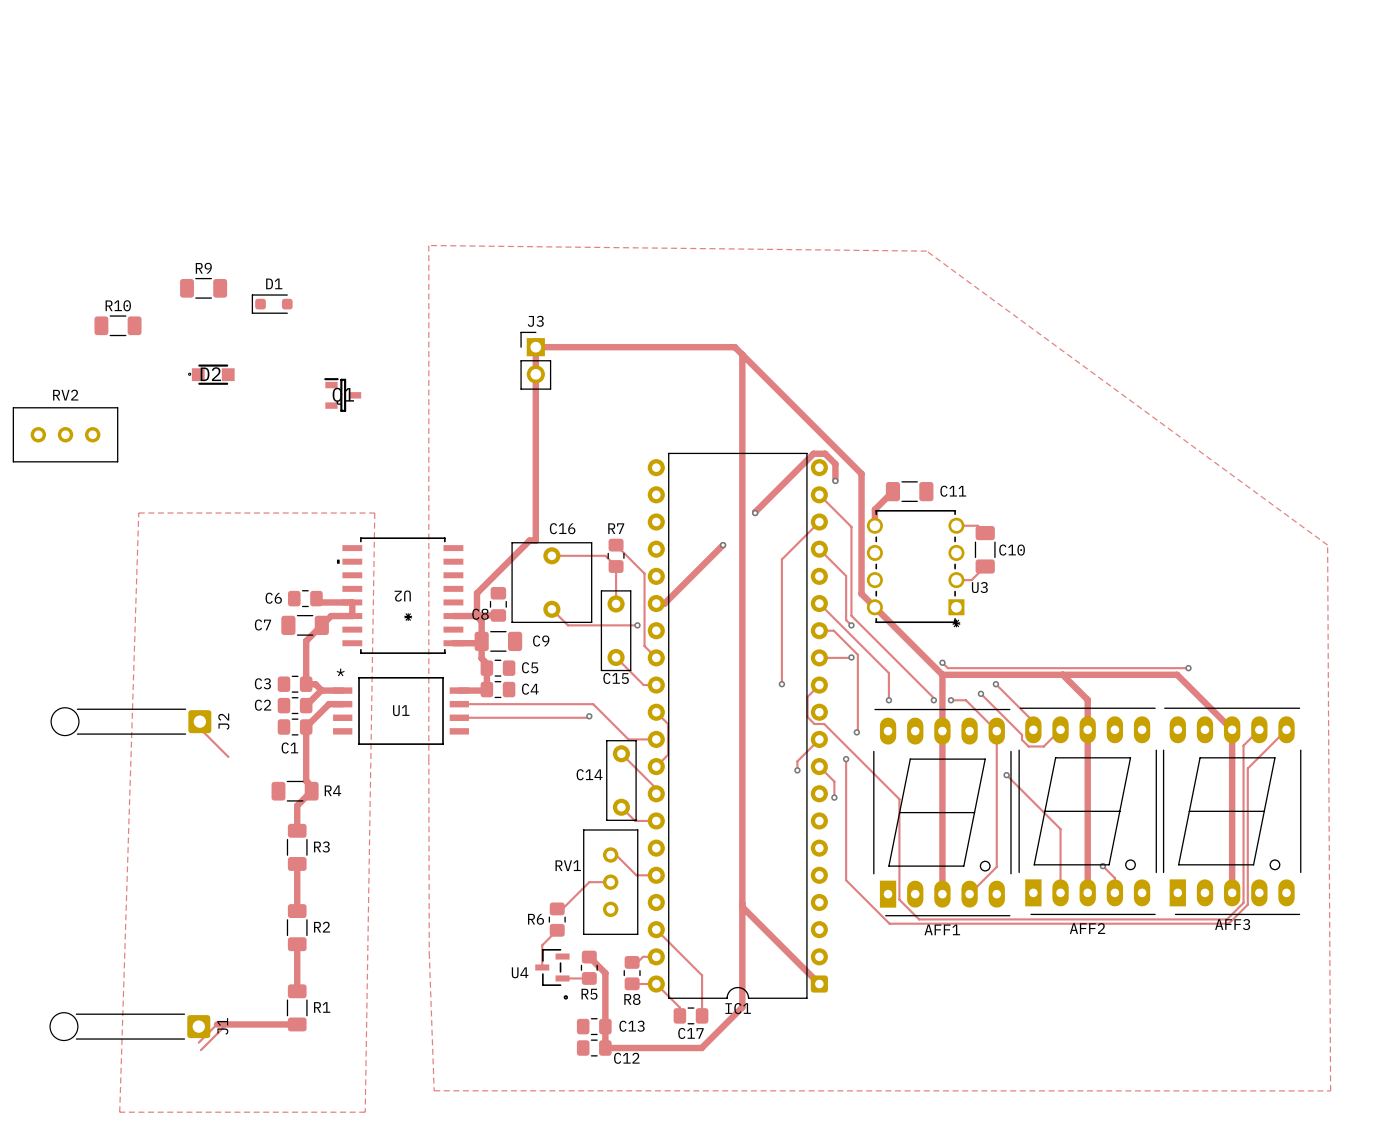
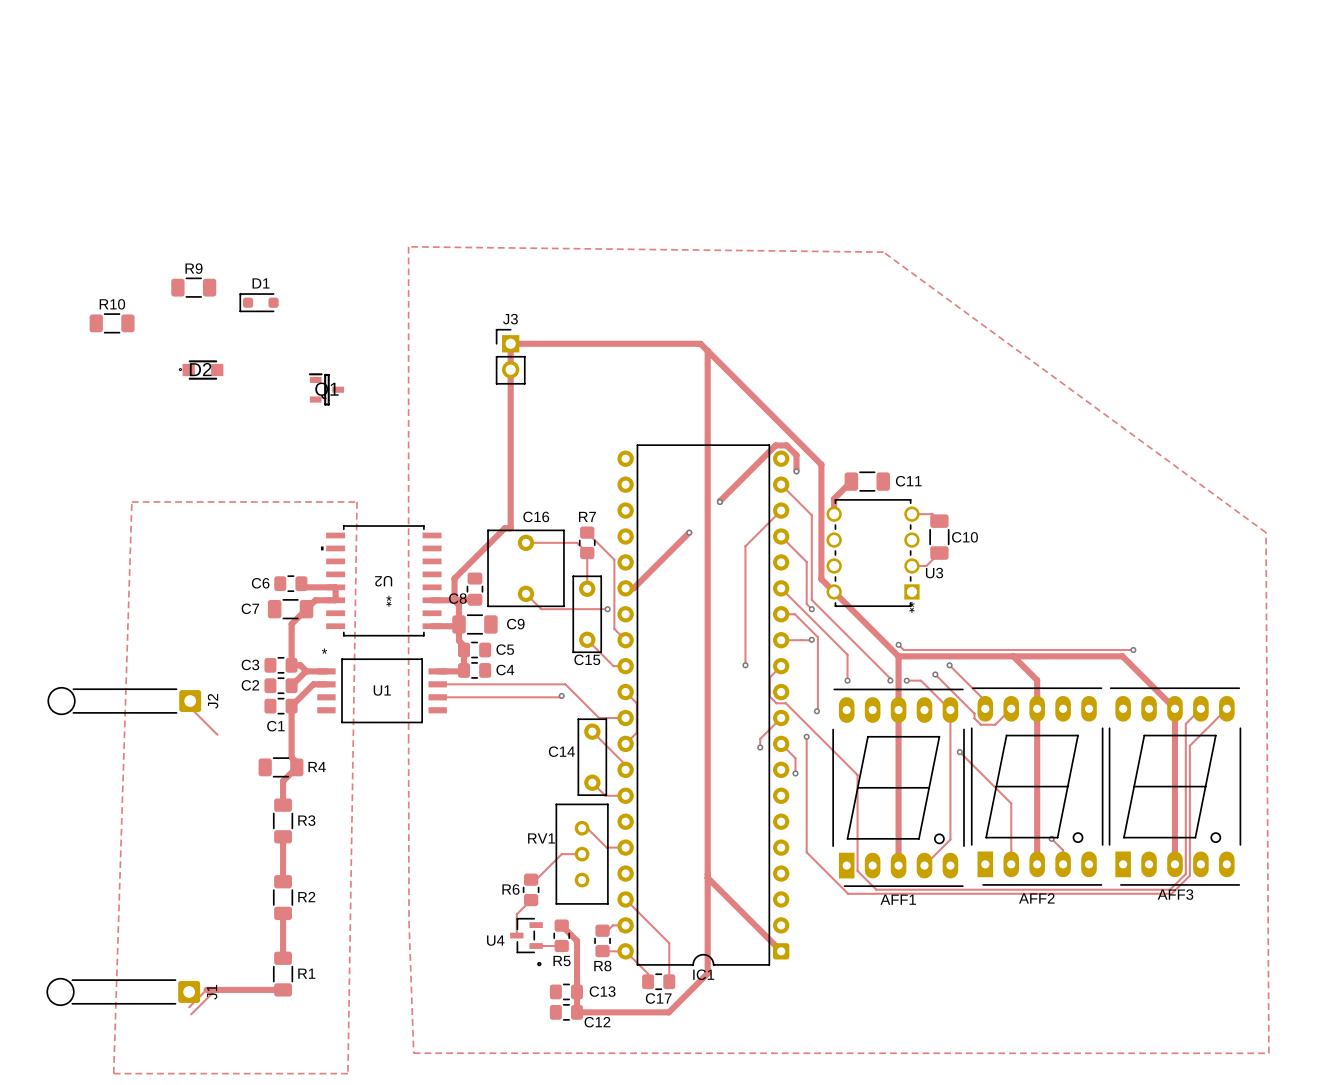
RV2: (65, 434) -> none

